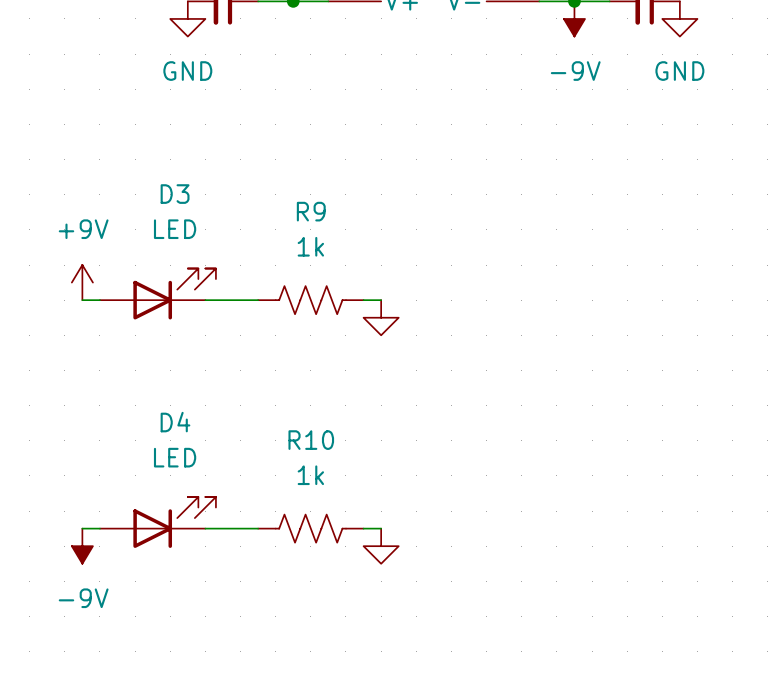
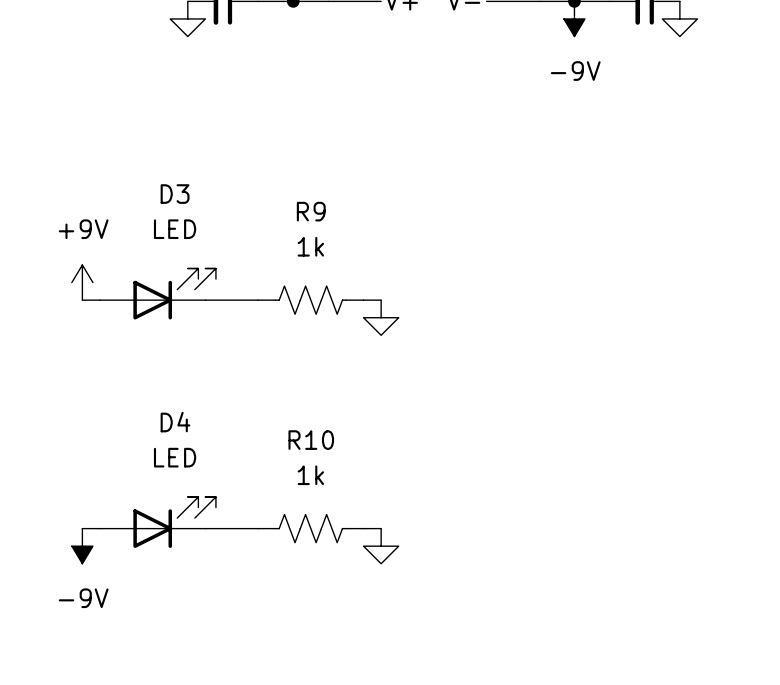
power symbol text: GND (187, 71) -> none
power symbol text: GND (679, 71) -> none

